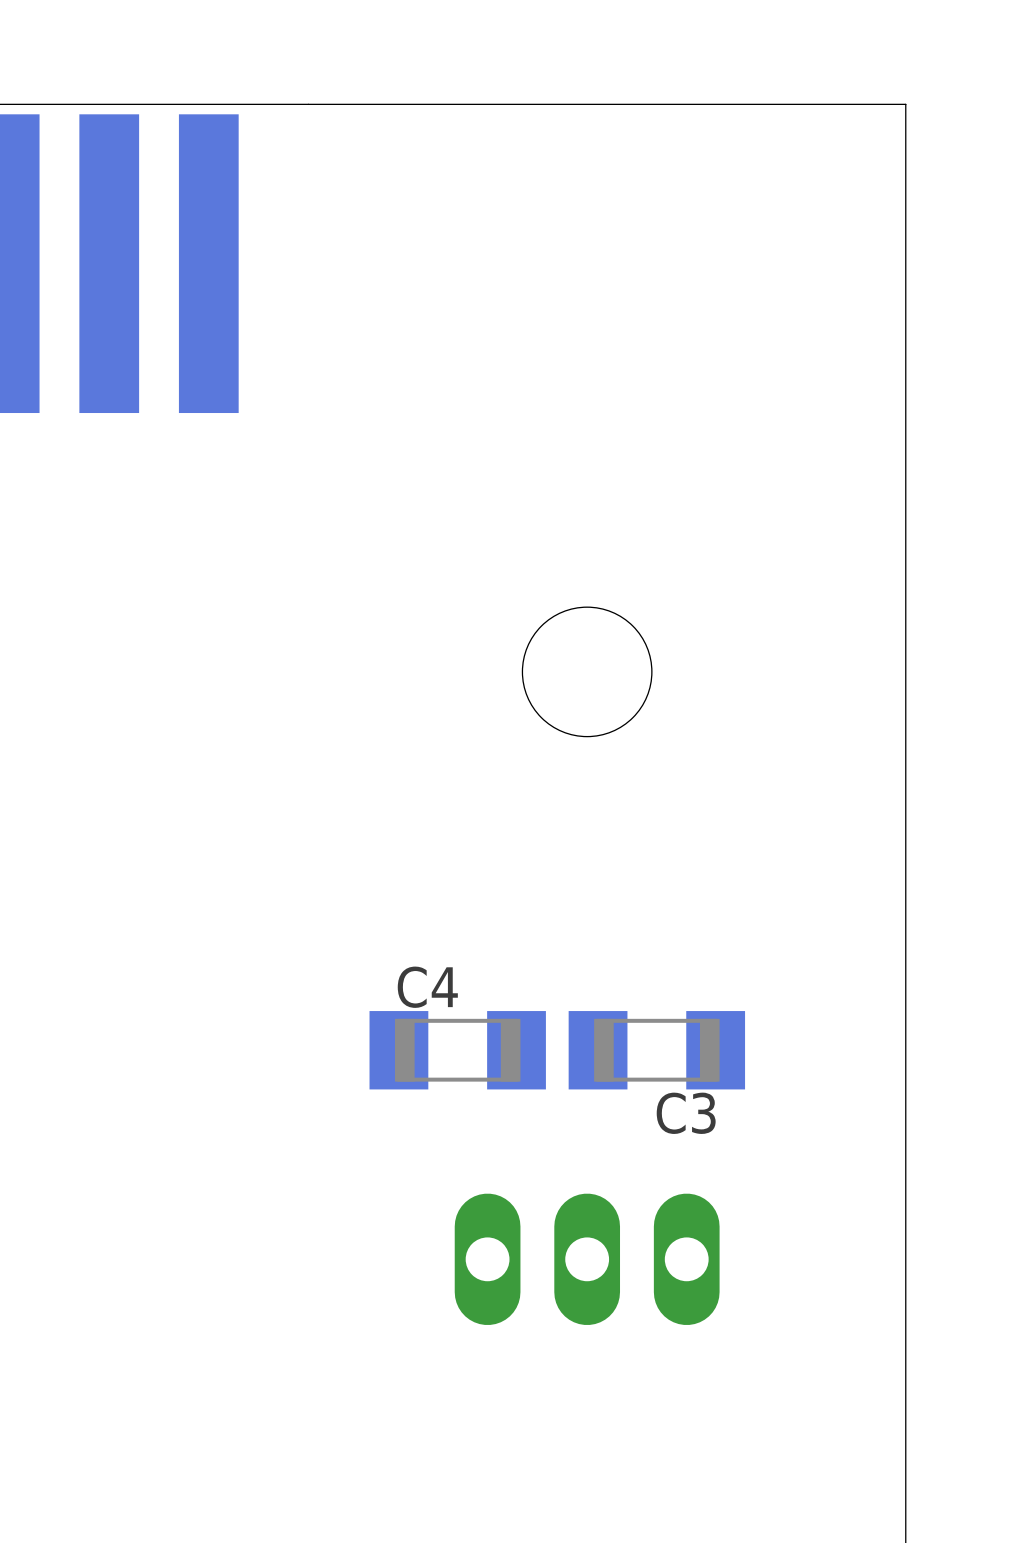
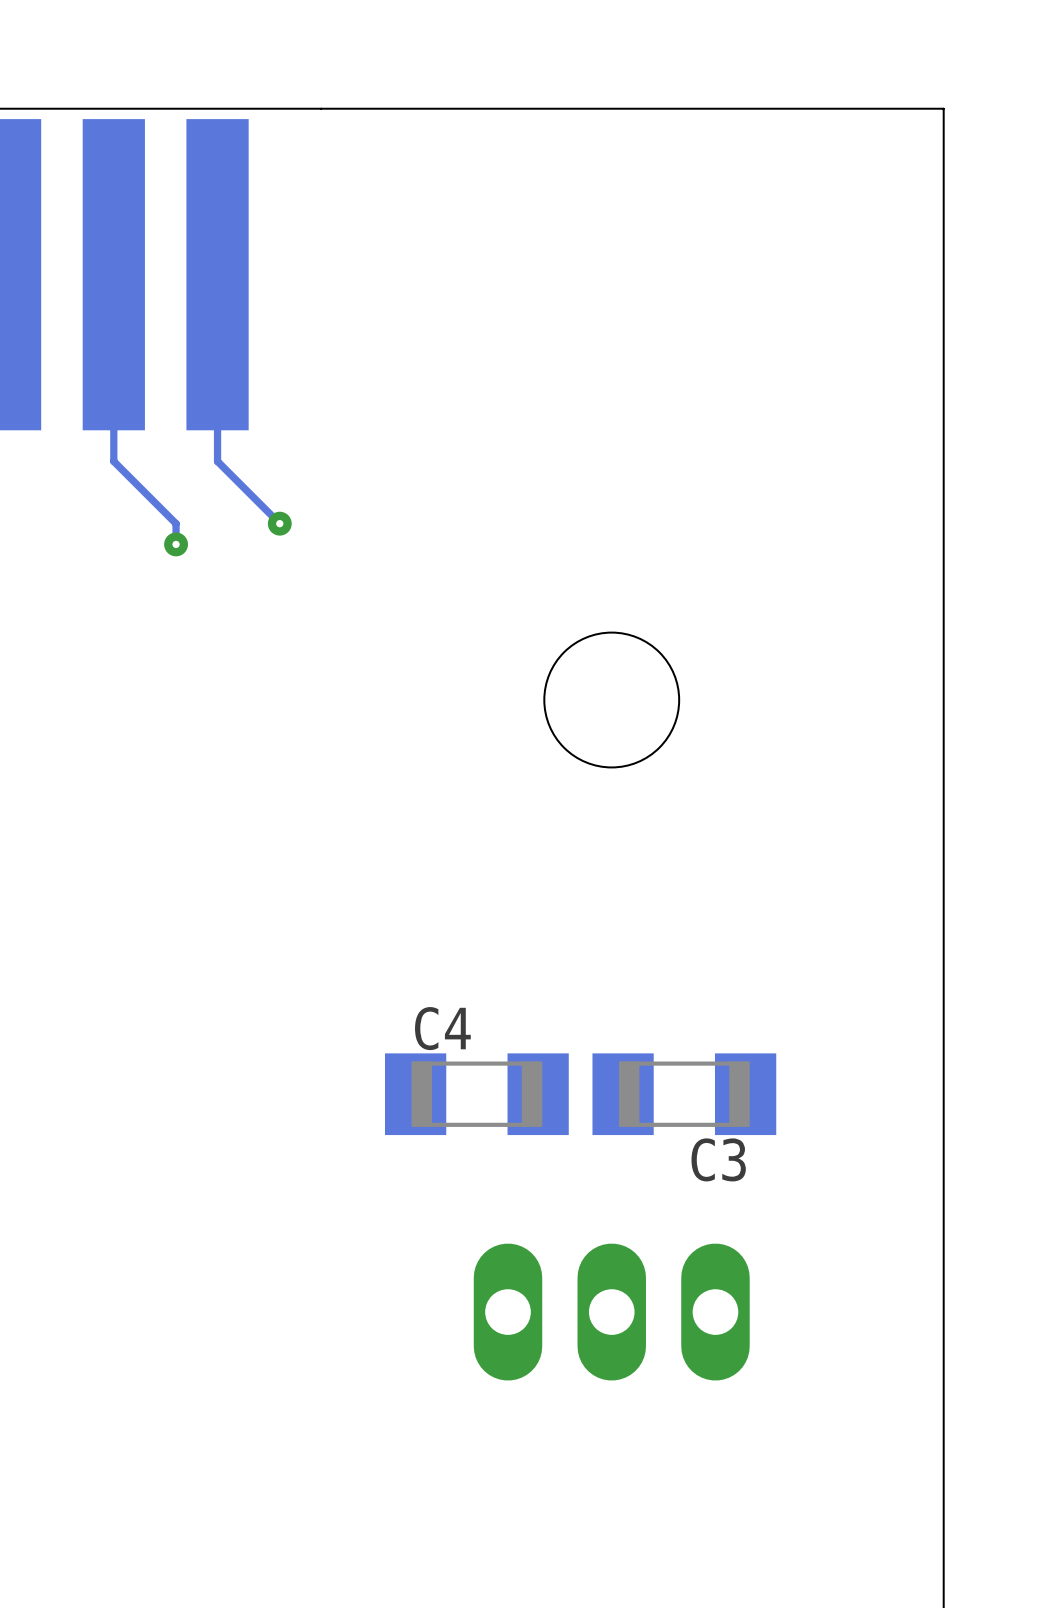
track: none -> (113, 274) (113, 461) (176, 523) (176, 544)
track: none -> (217, 274) (217, 461) (279, 523)
via: none -> (279, 523)
via: none -> (176, 544)

